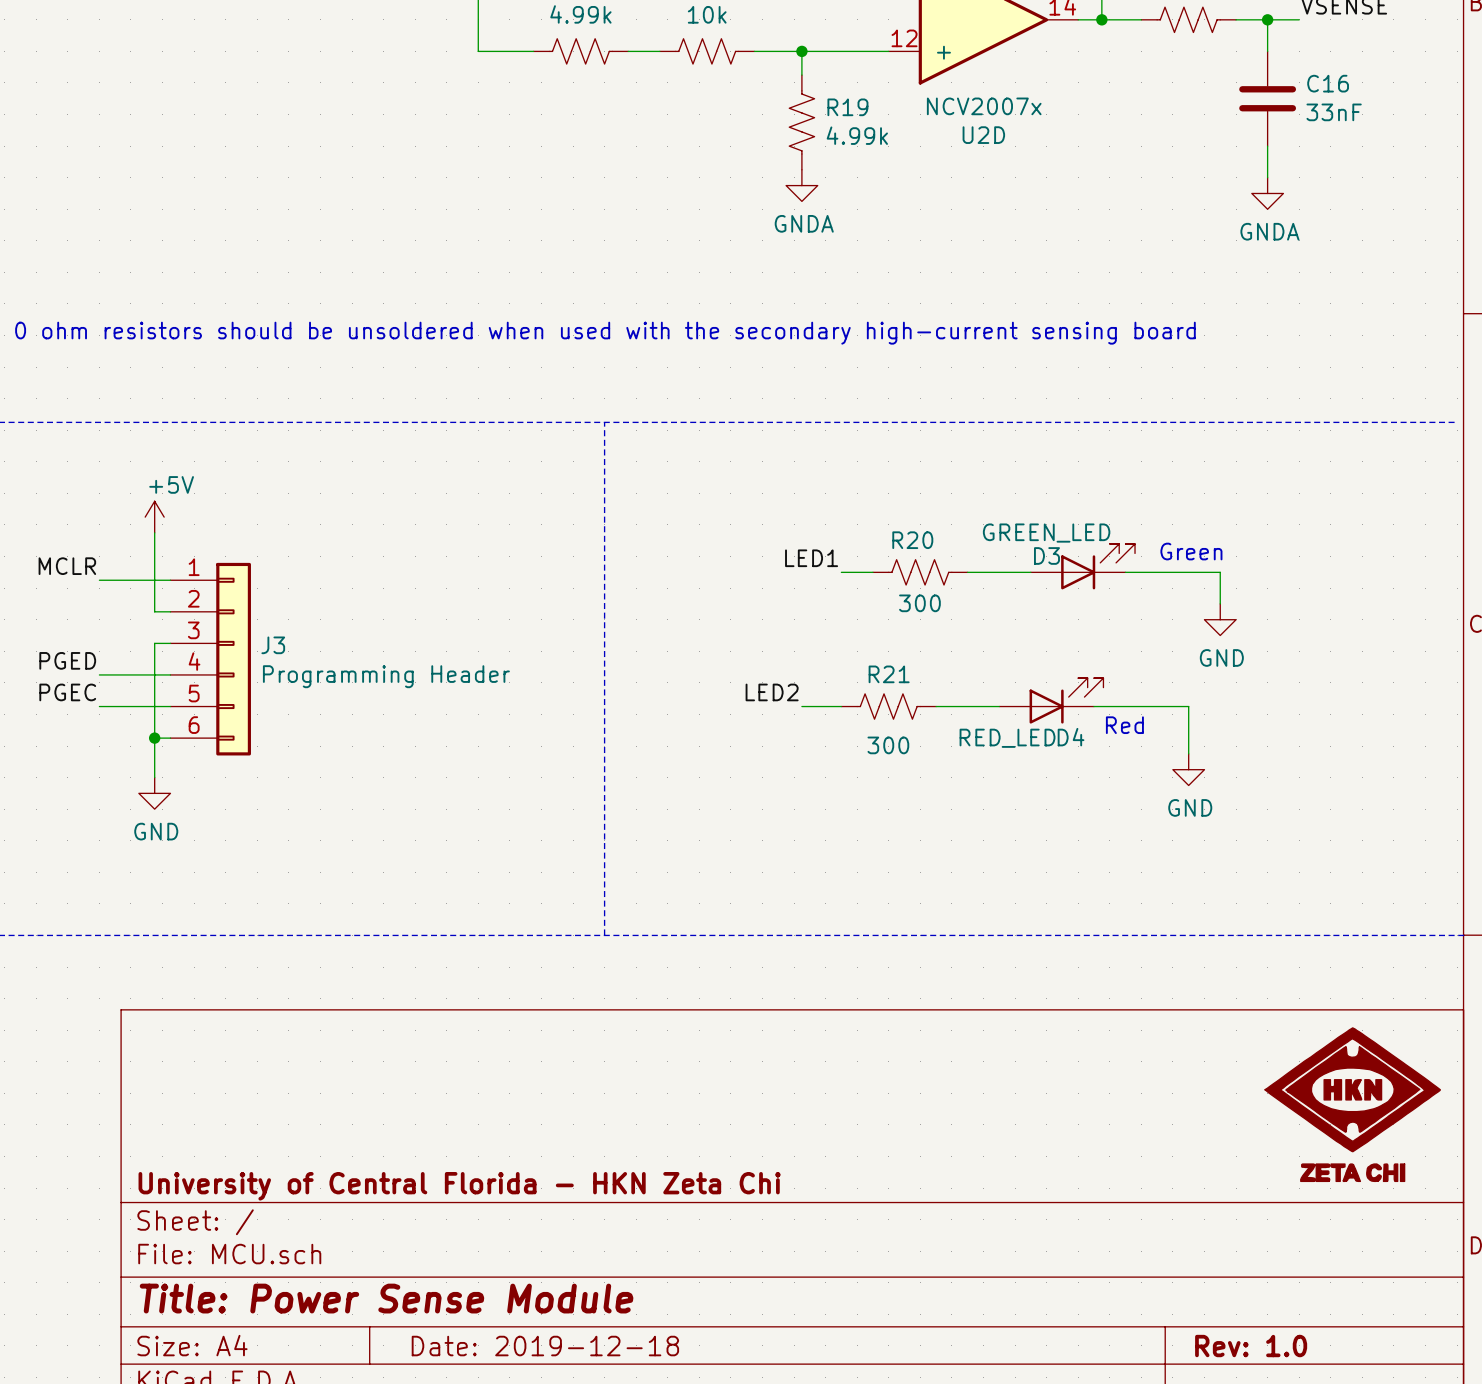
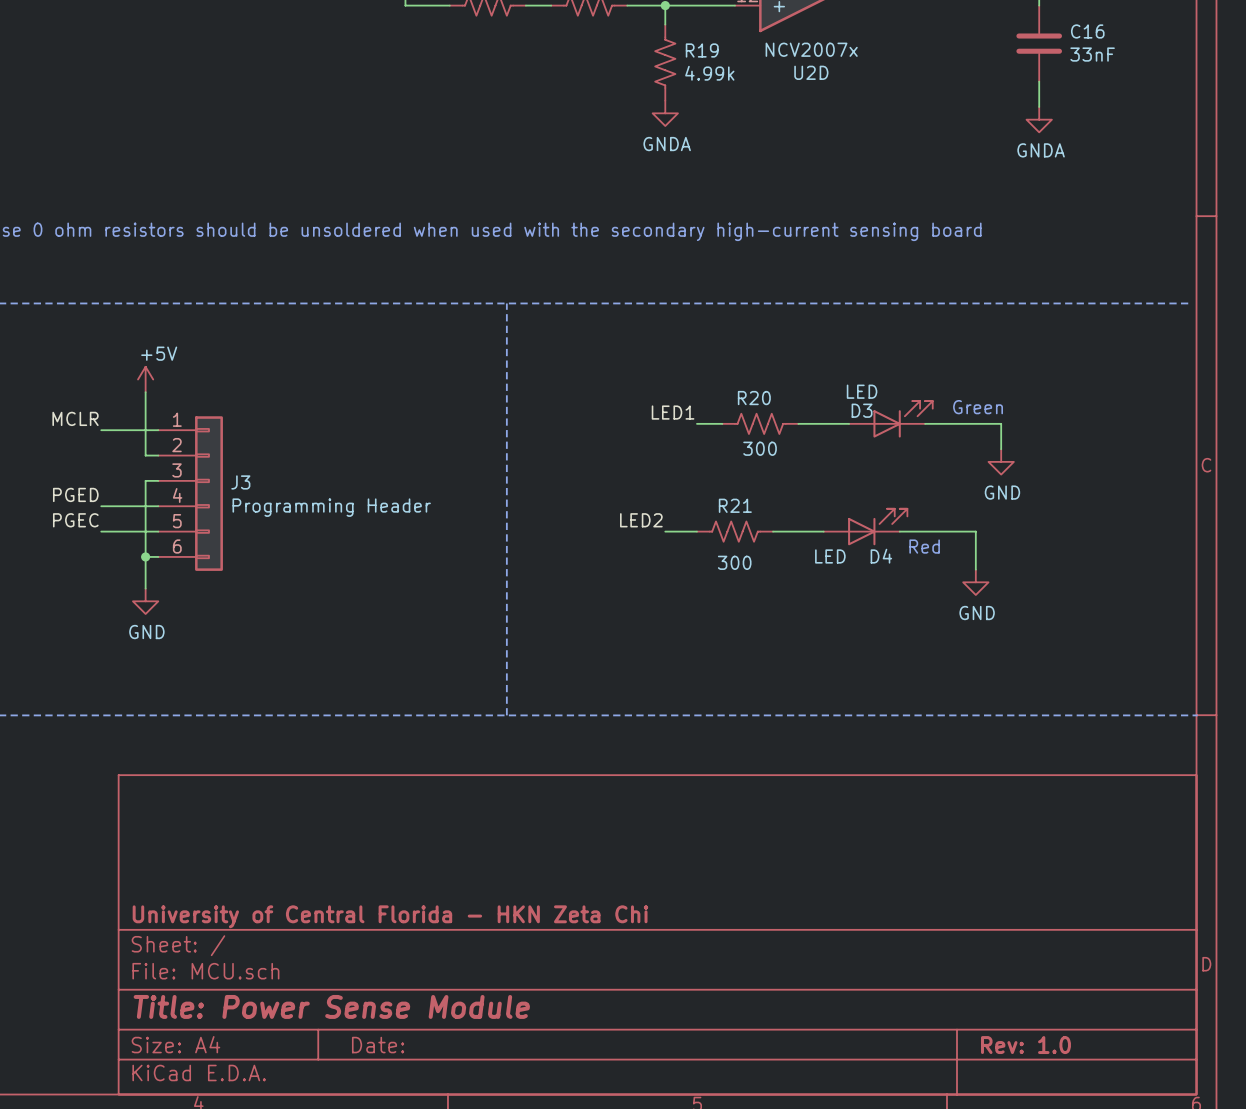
D3 value: GREEN_LED (1046, 533) -> LED (862, 391)
D4 value: RED_LED (1007, 738) -> LED (830, 556)
power symbol: (1352, 1104) -> none
title block: Date: 2019-12-18 (545, 1346) -> Date: (378, 1045)

